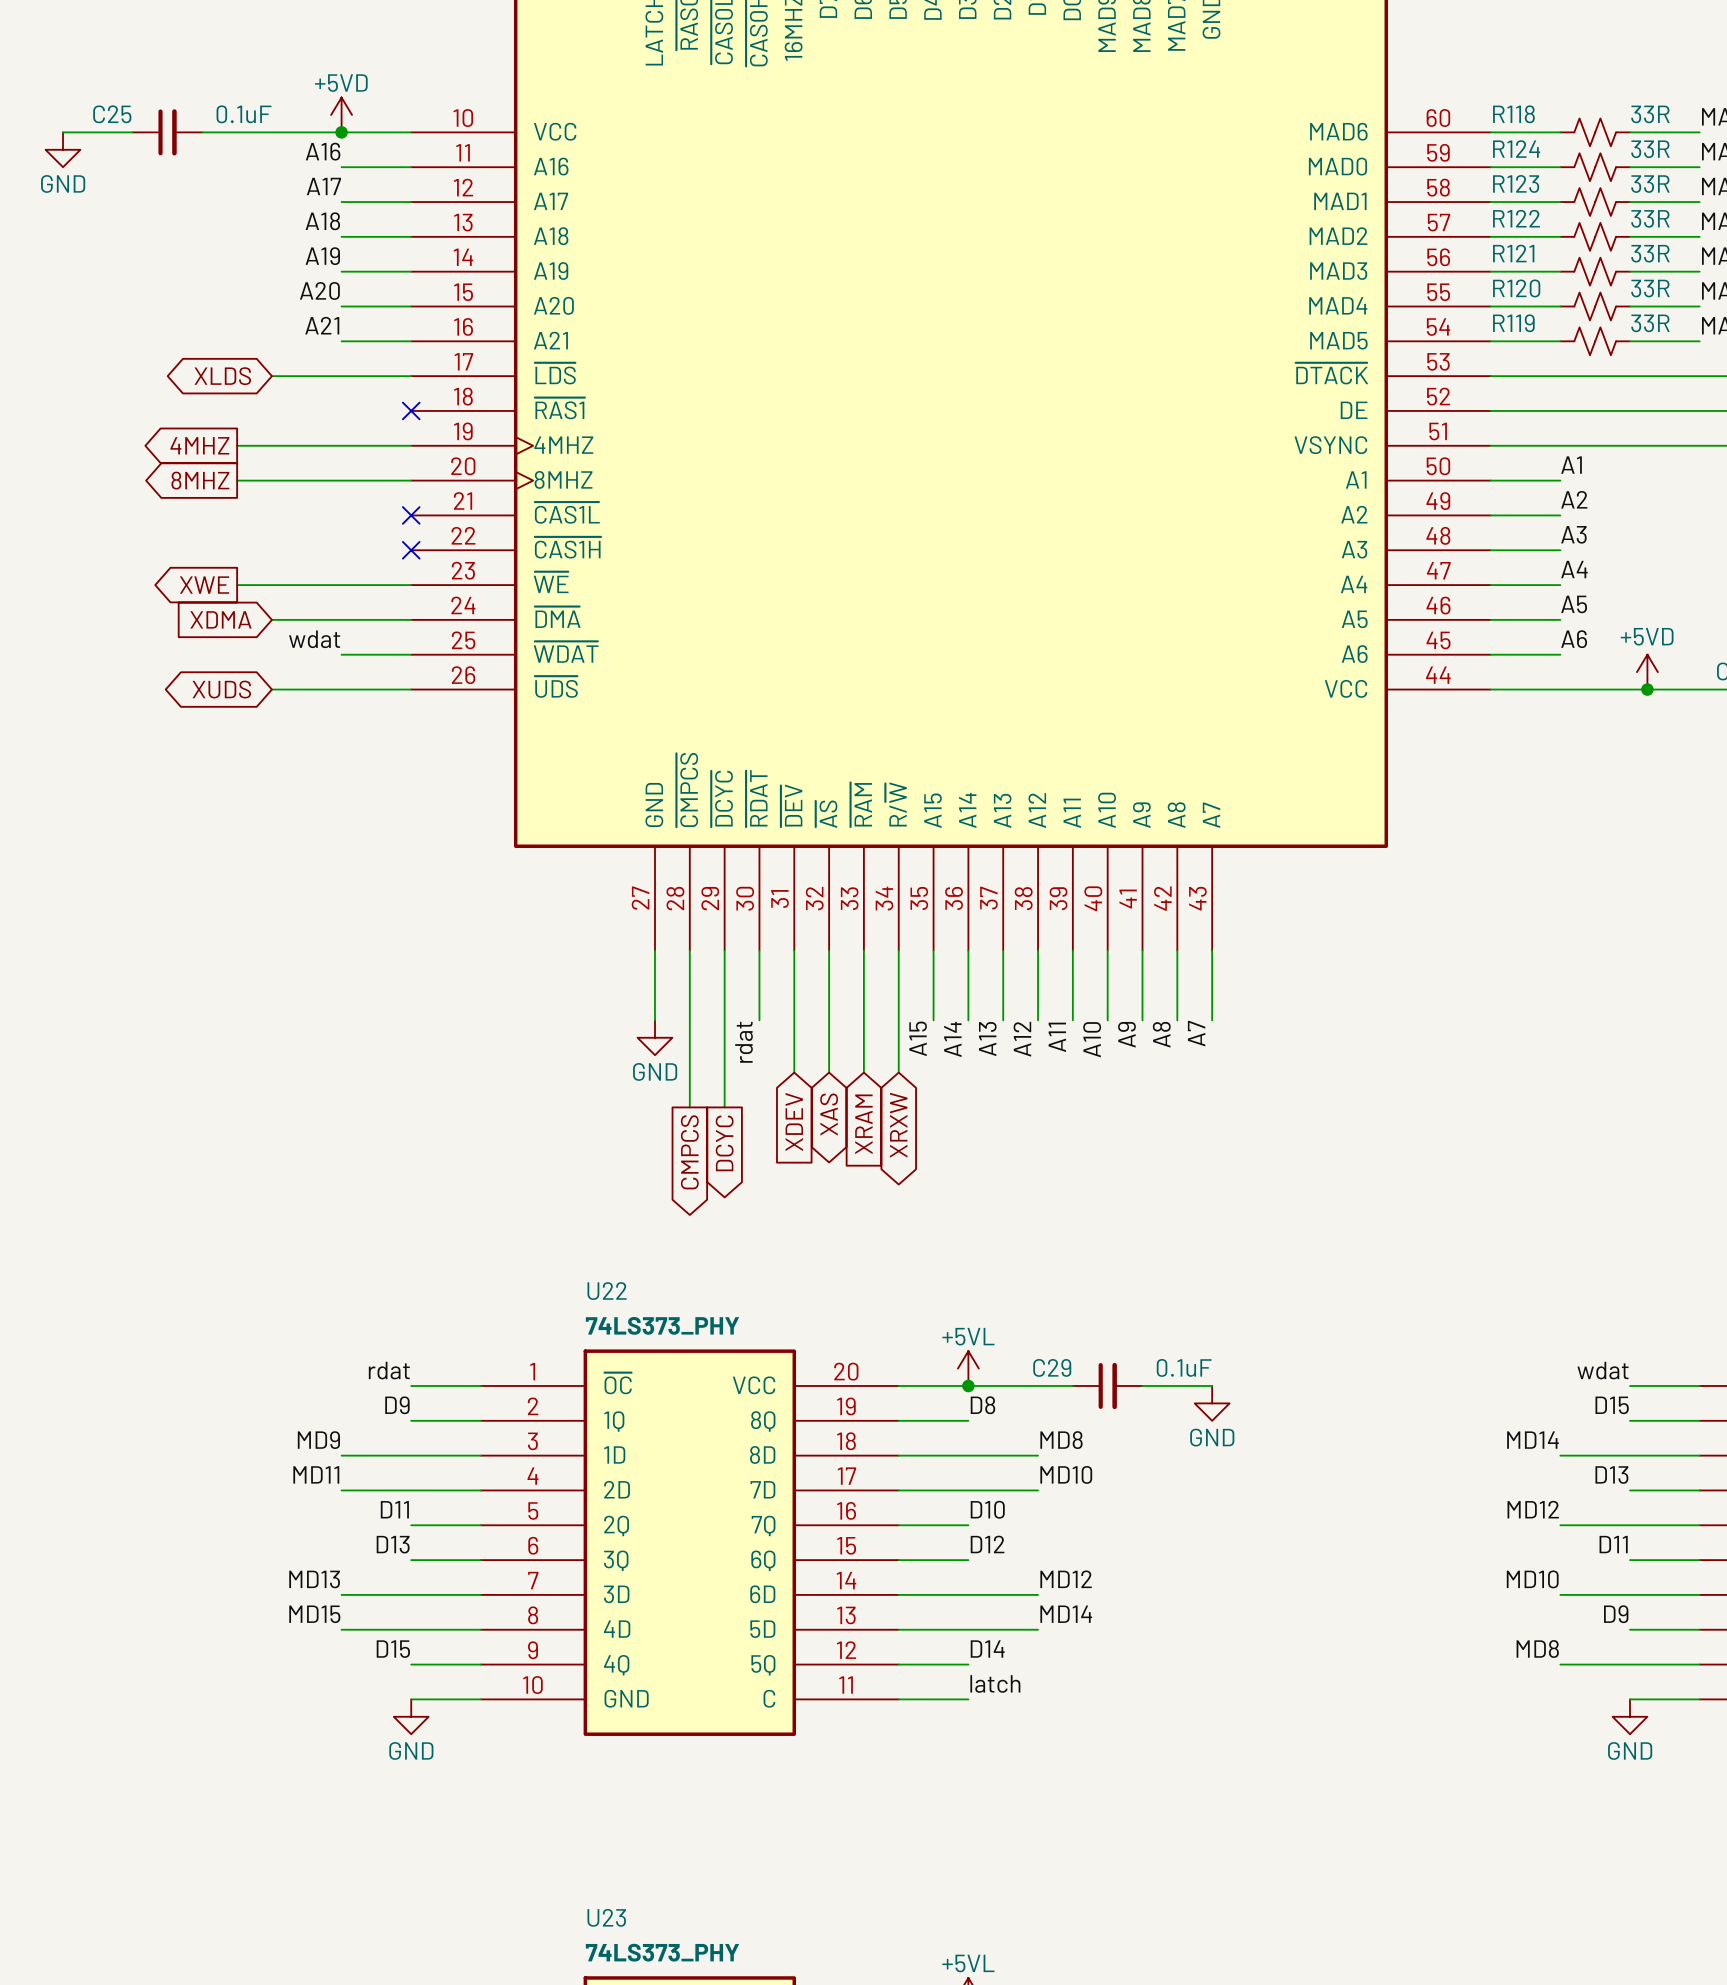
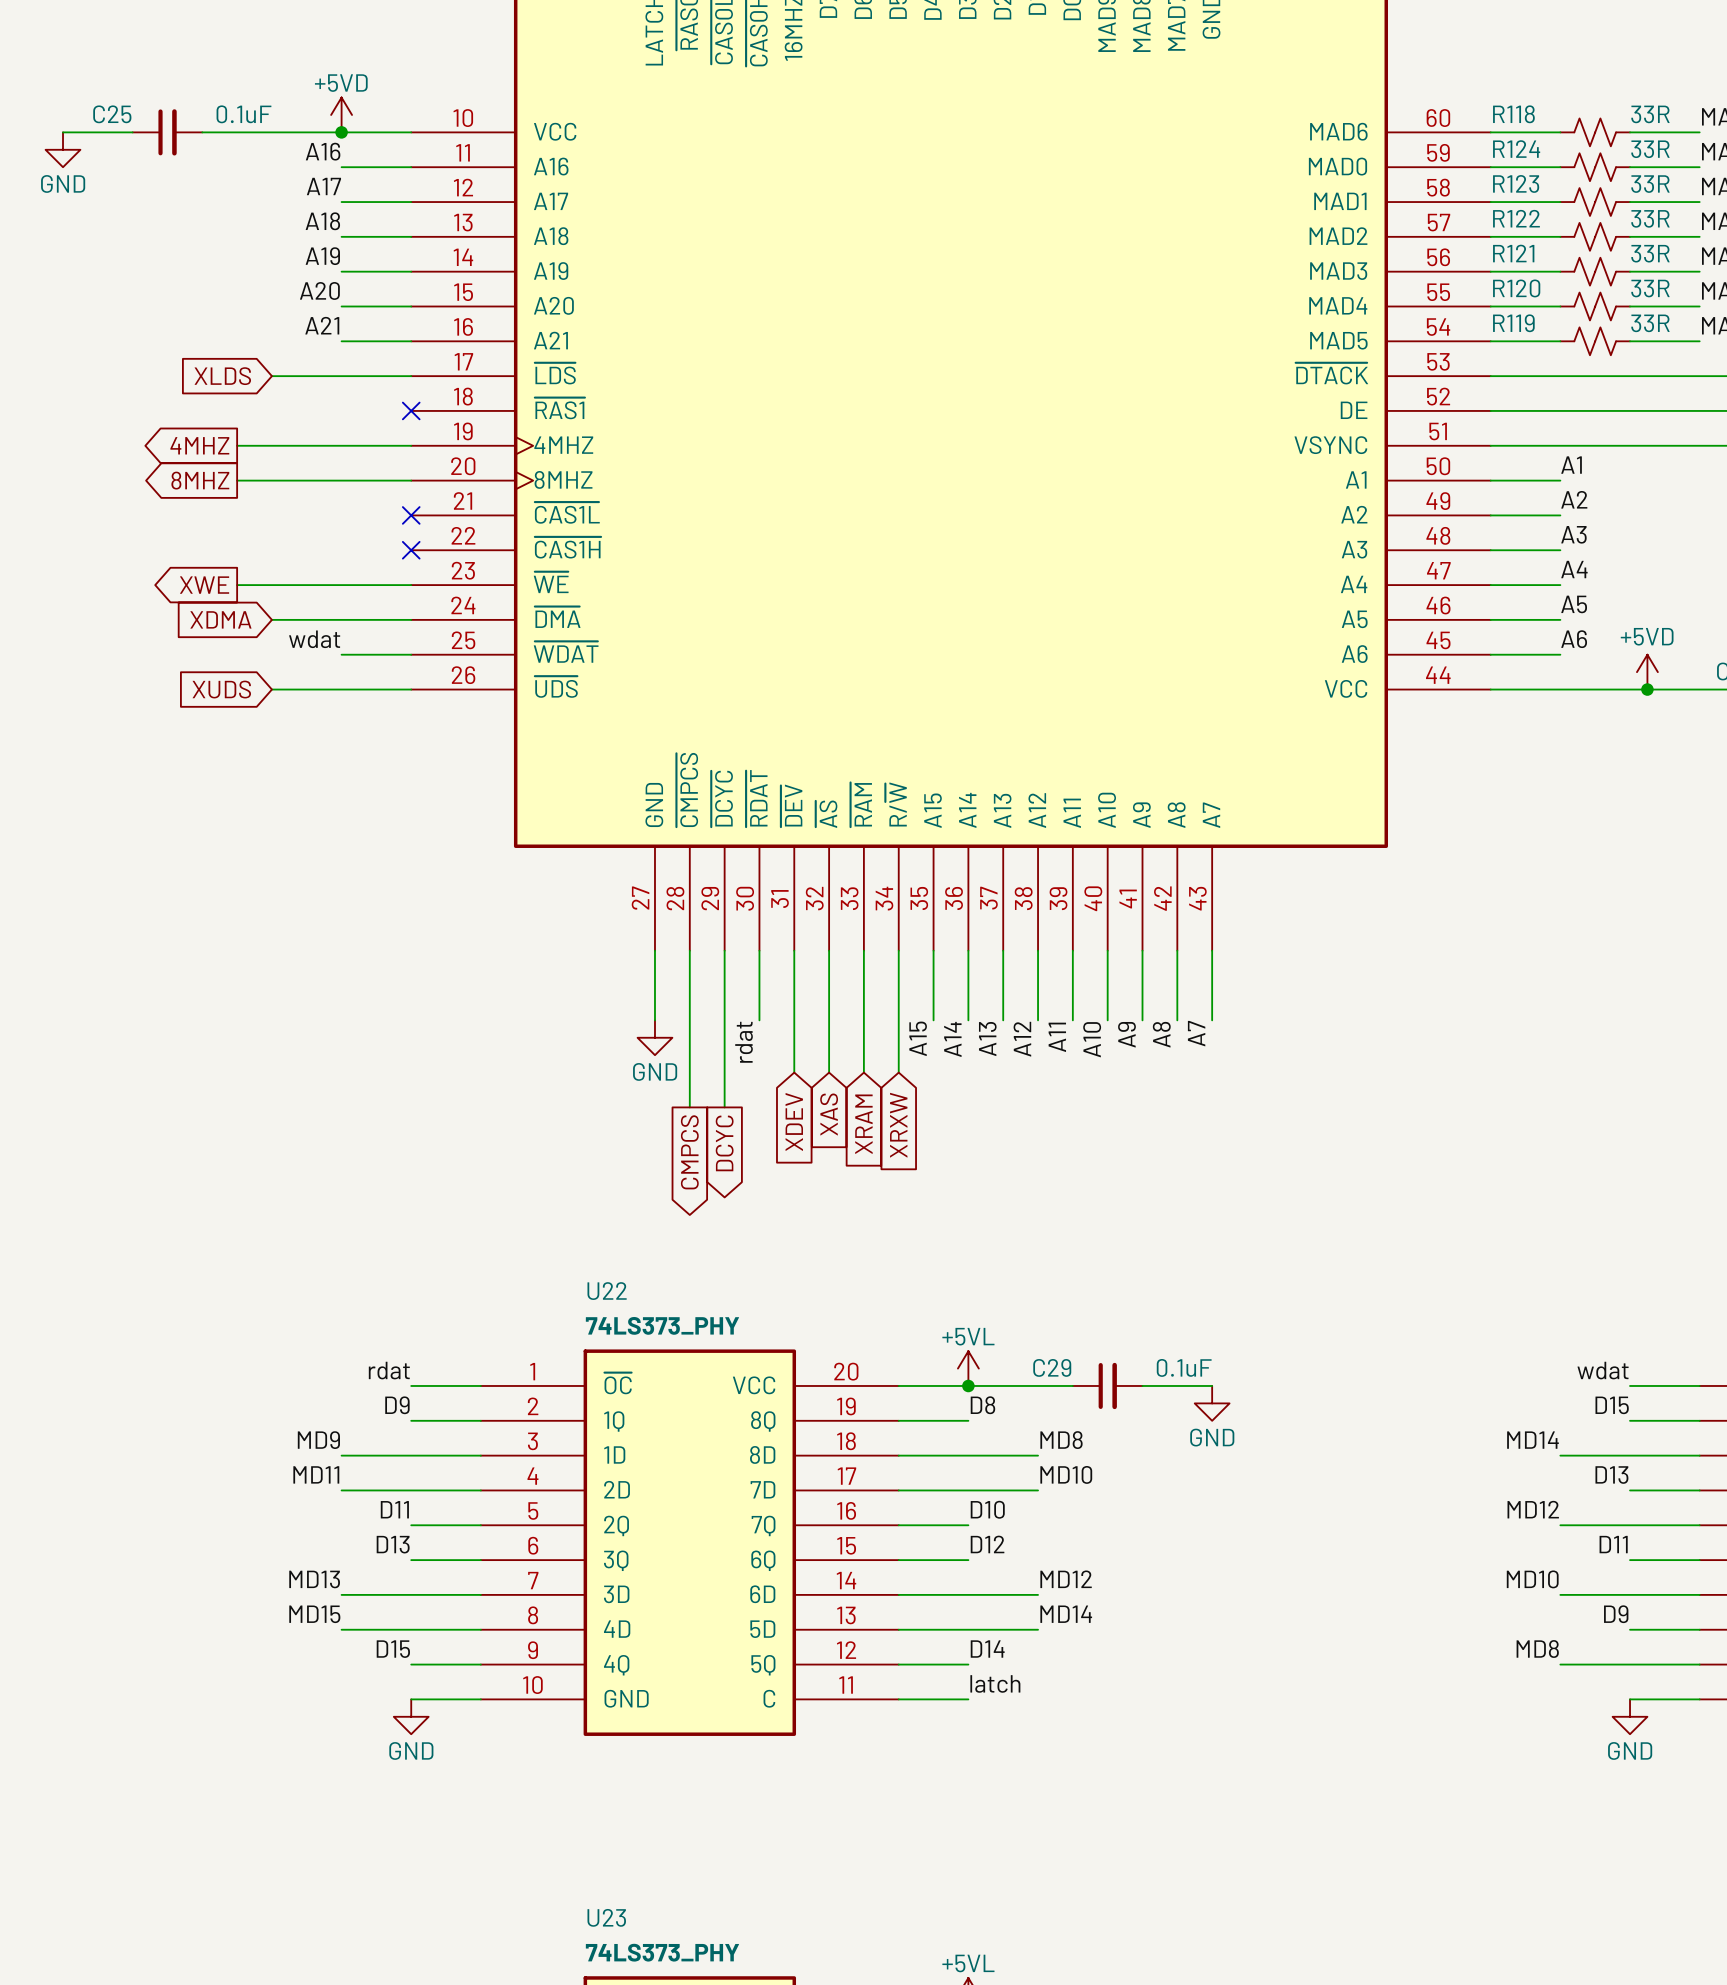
global label shape: bidirectional (222, 376) -> input (222, 376)
global label shape: bidirectional (221, 689) -> input (221, 689)
global label shape: bidirectional (829, 1114) -> input (829, 1114)
global label shape: bidirectional (898, 1125) -> input (898, 1125)

